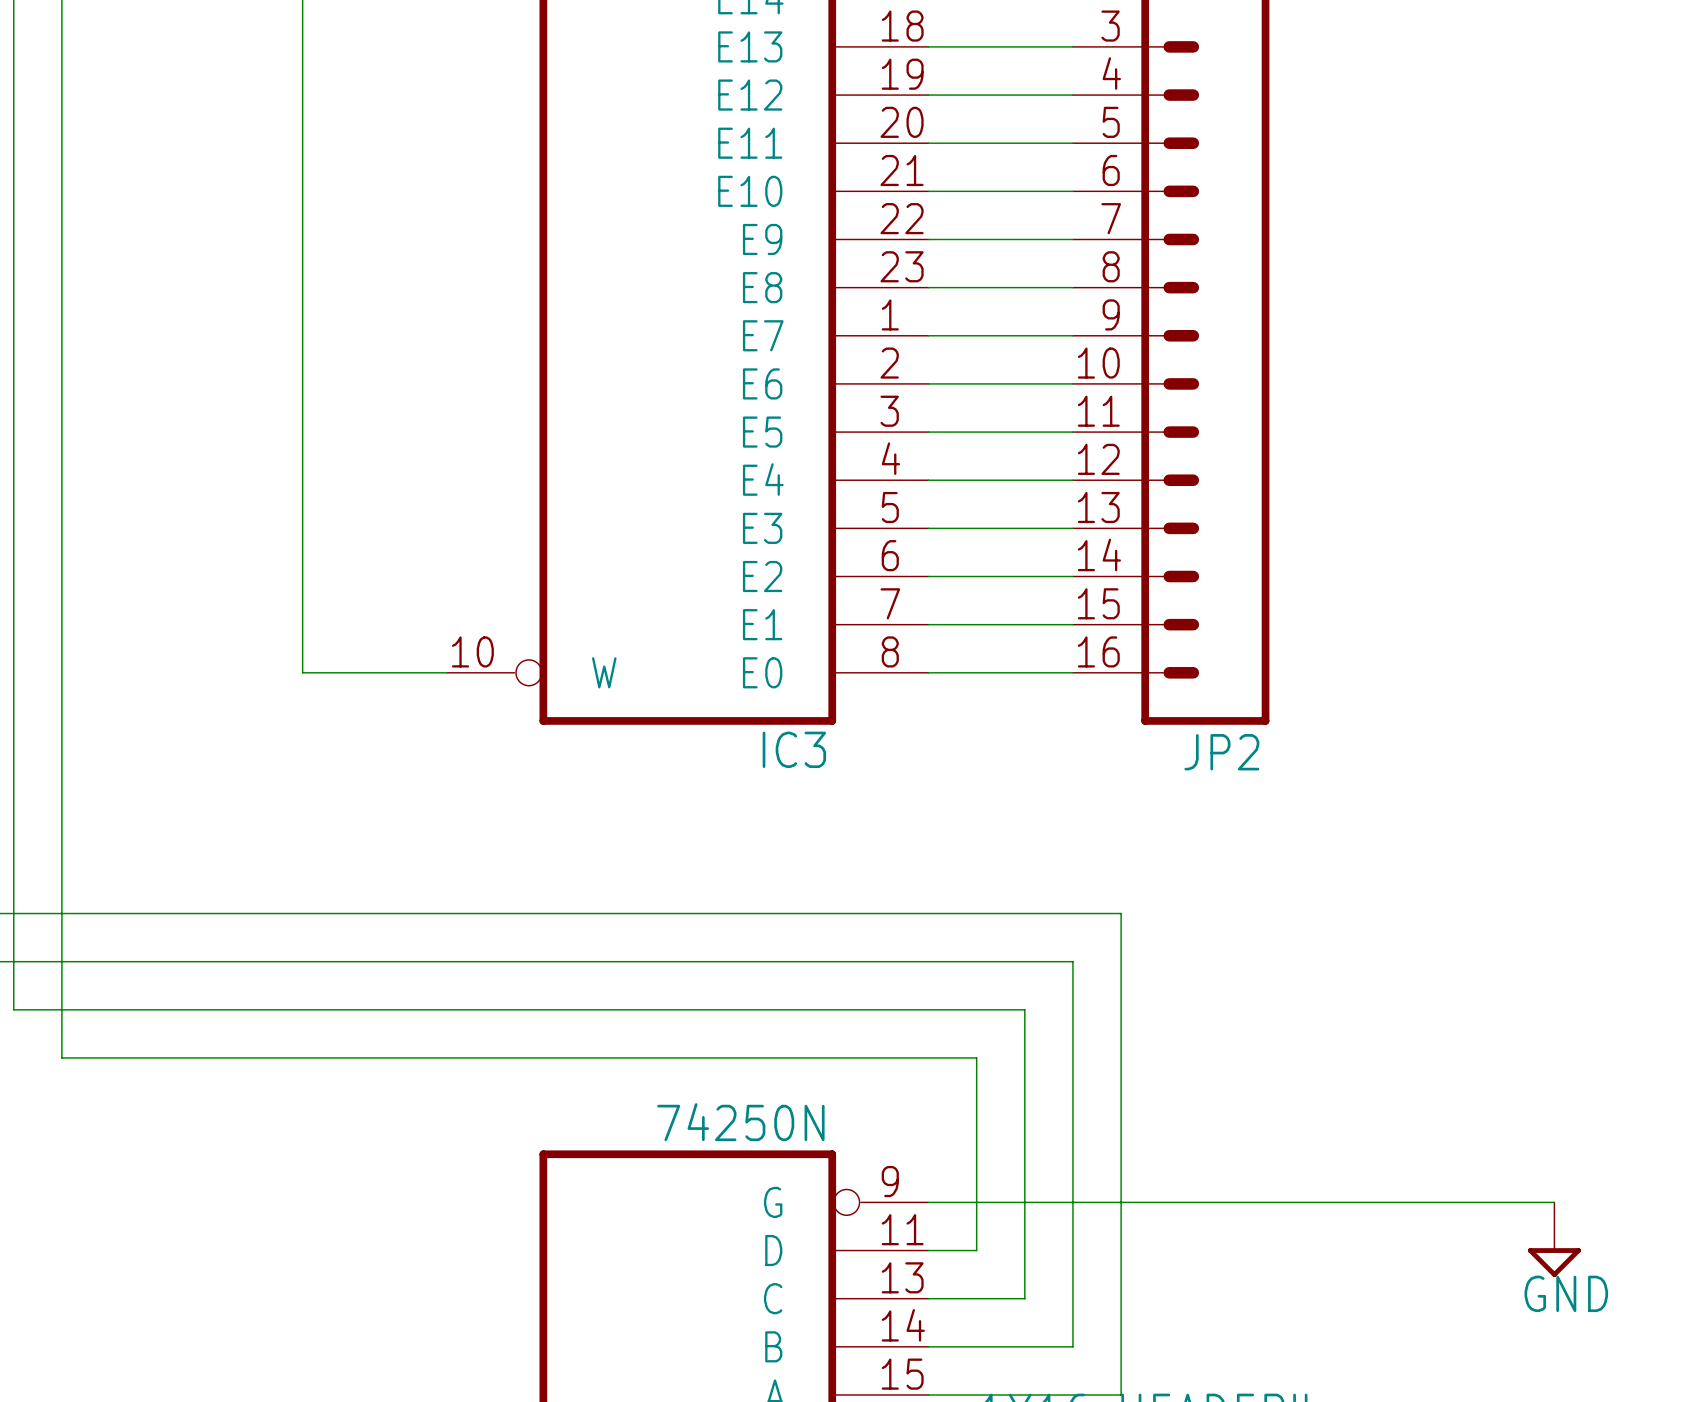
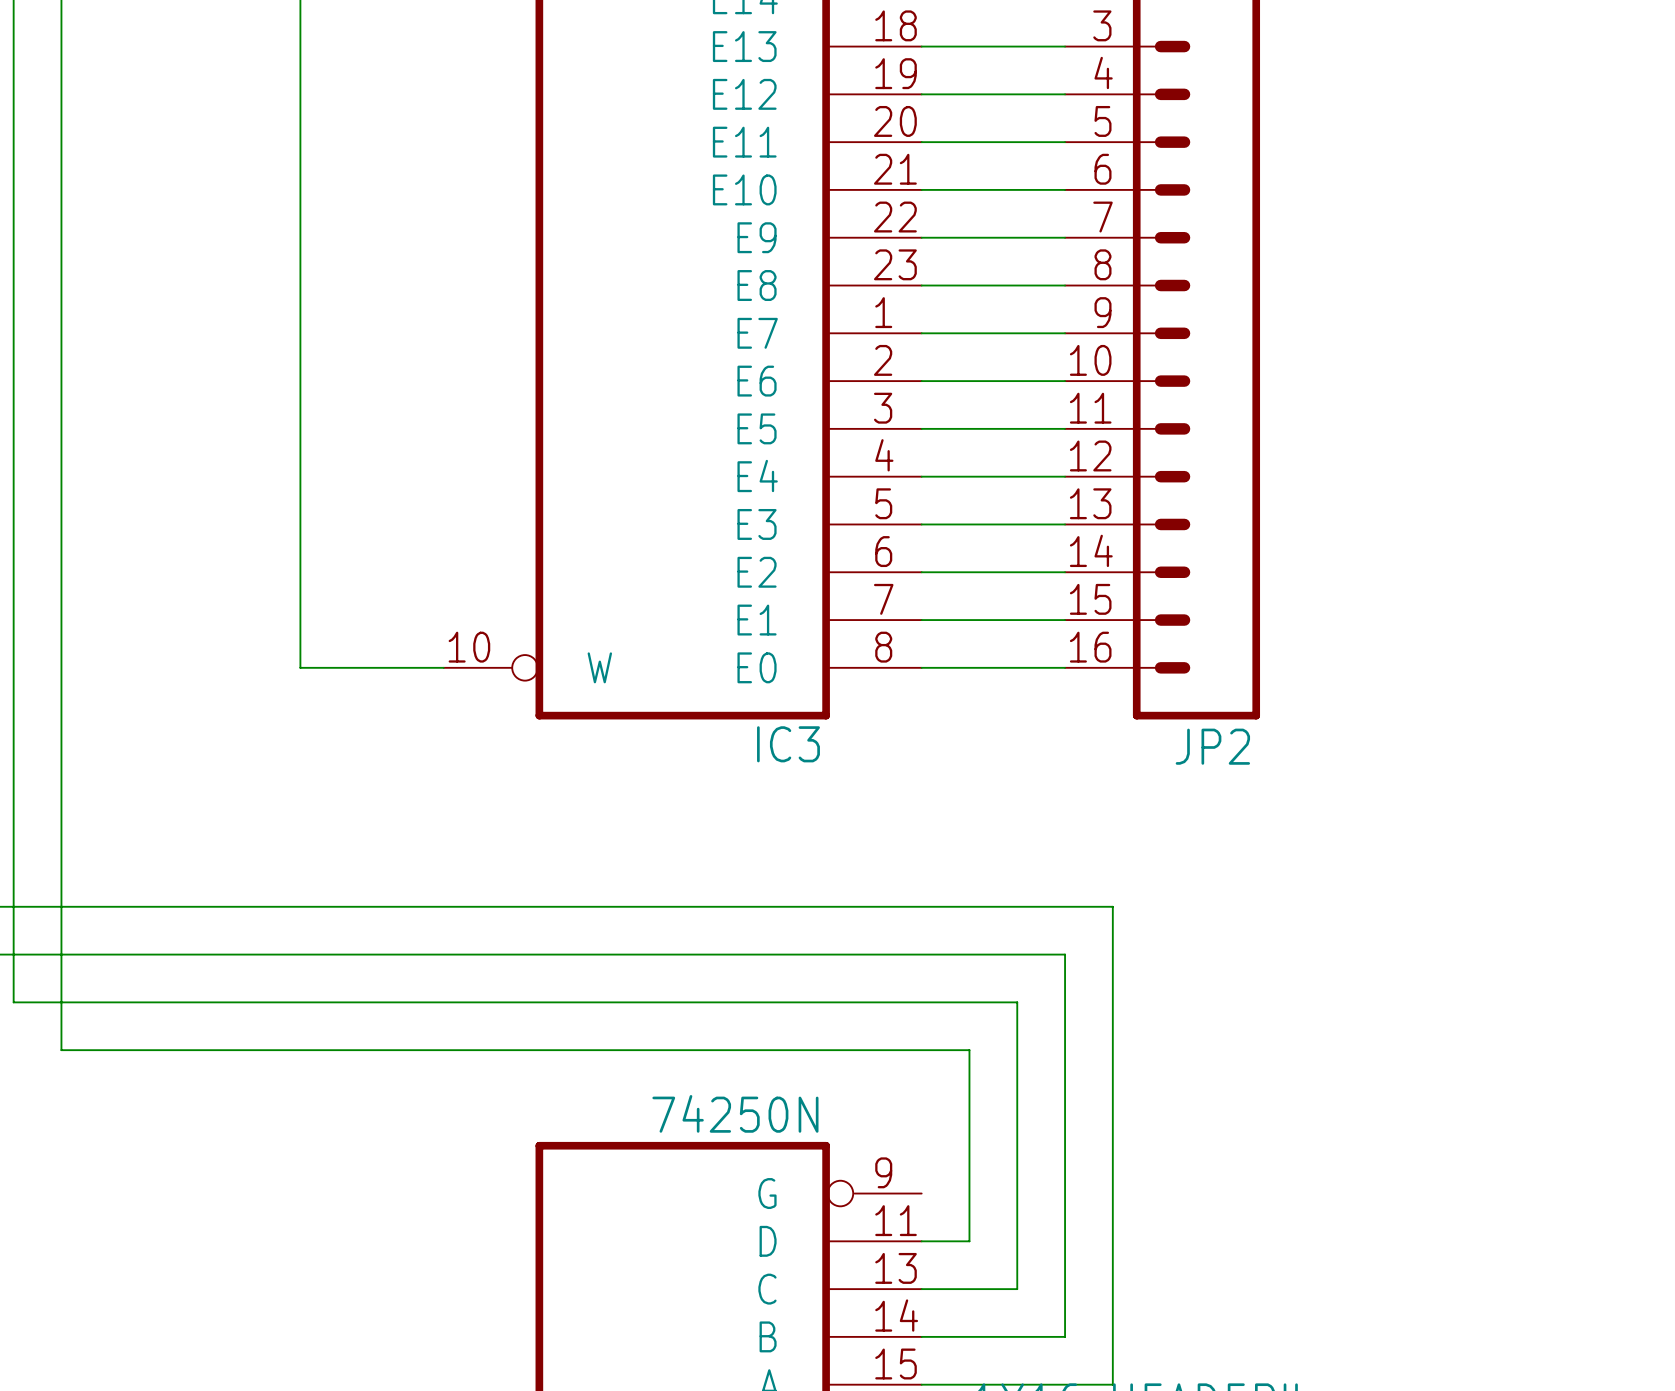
wire: (928, 1202) (1554, 1202) -> none
power symbol: GND (1554, 1239) -> none

